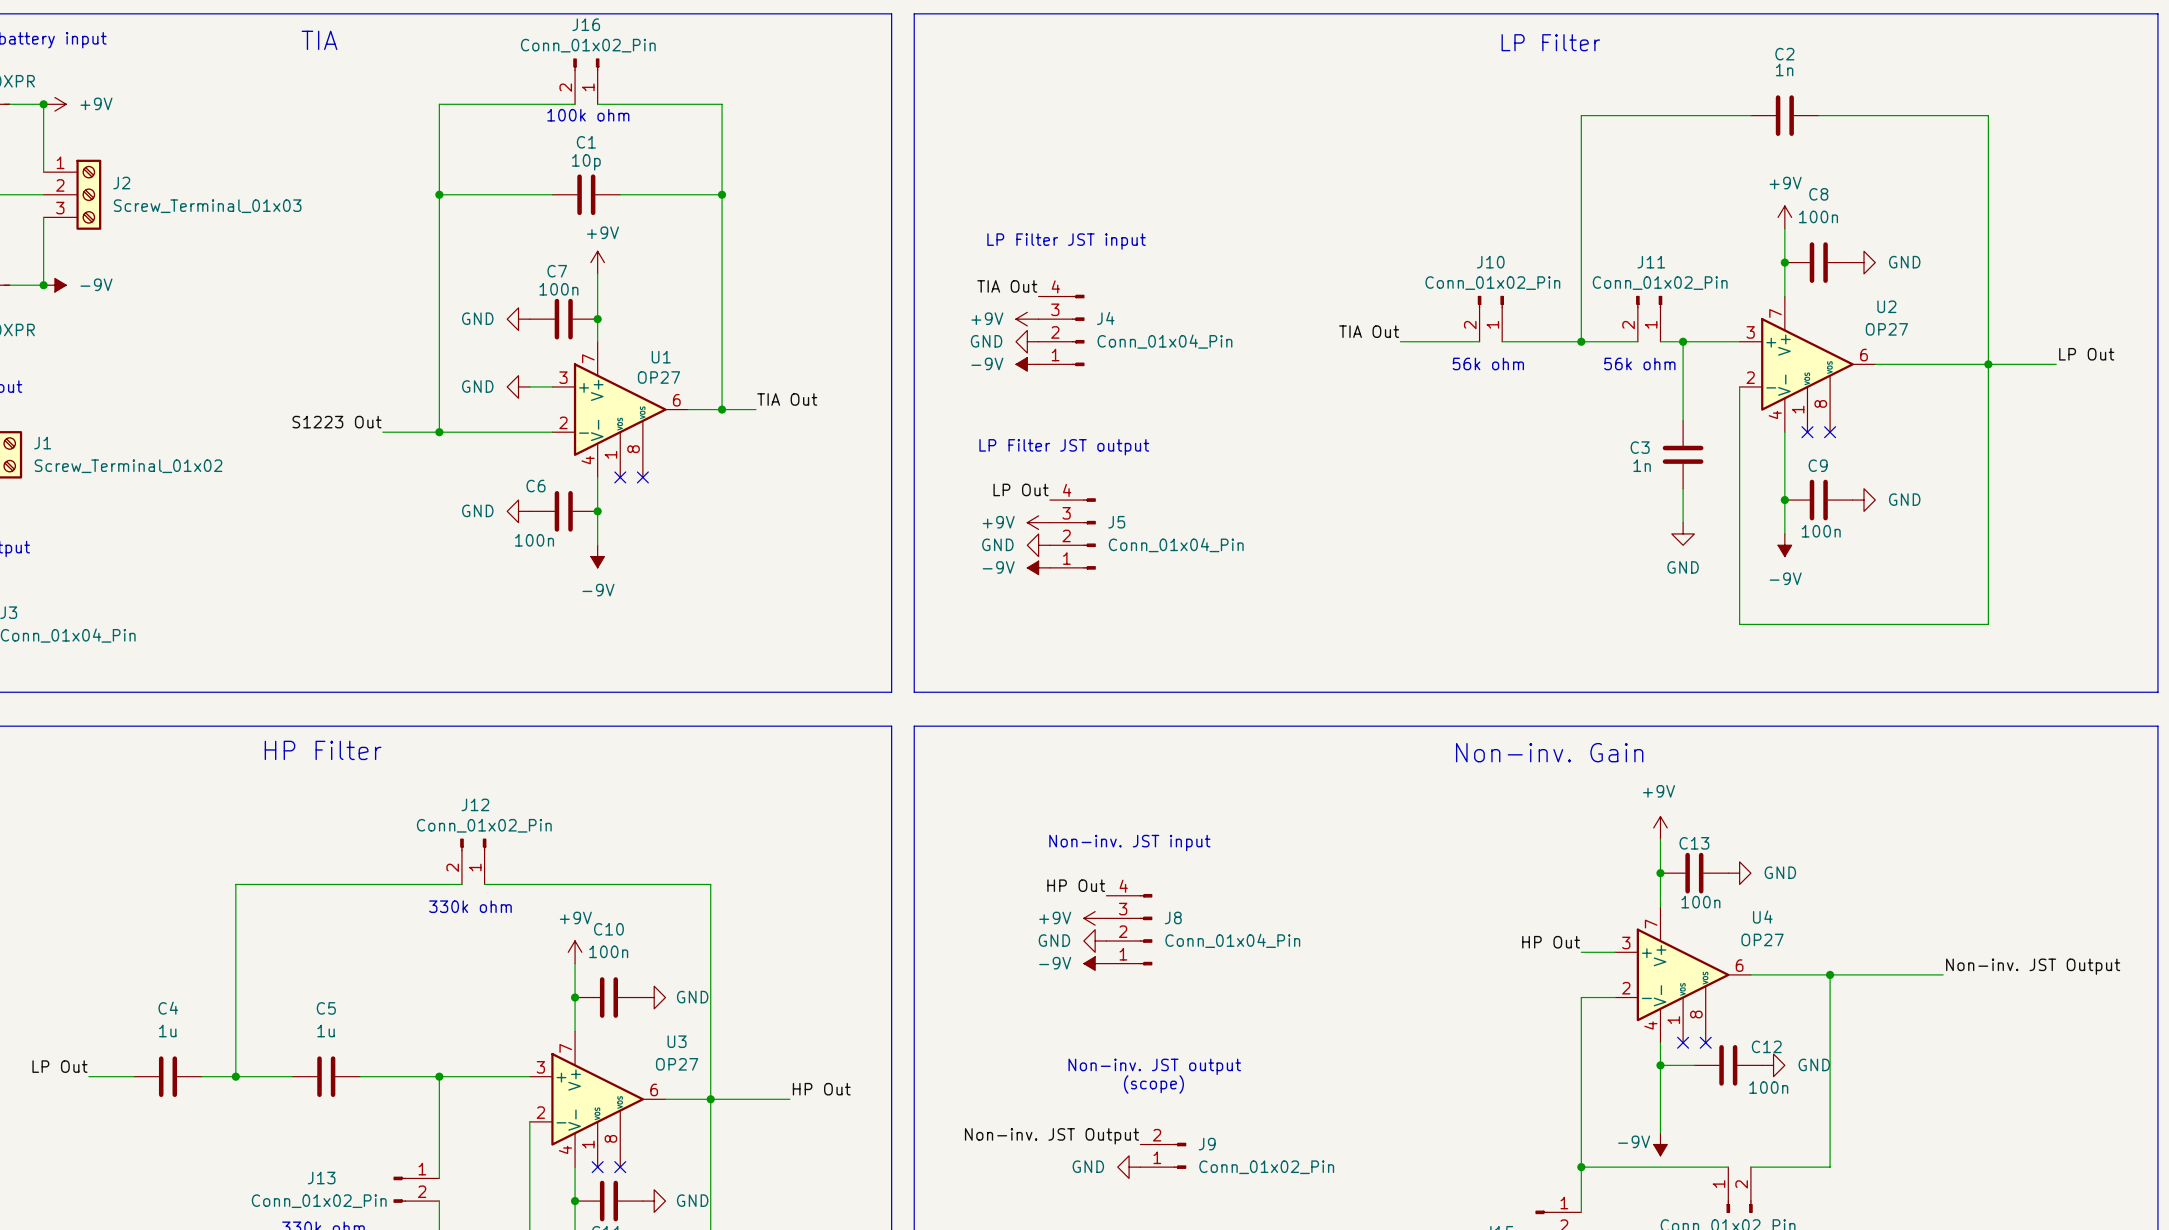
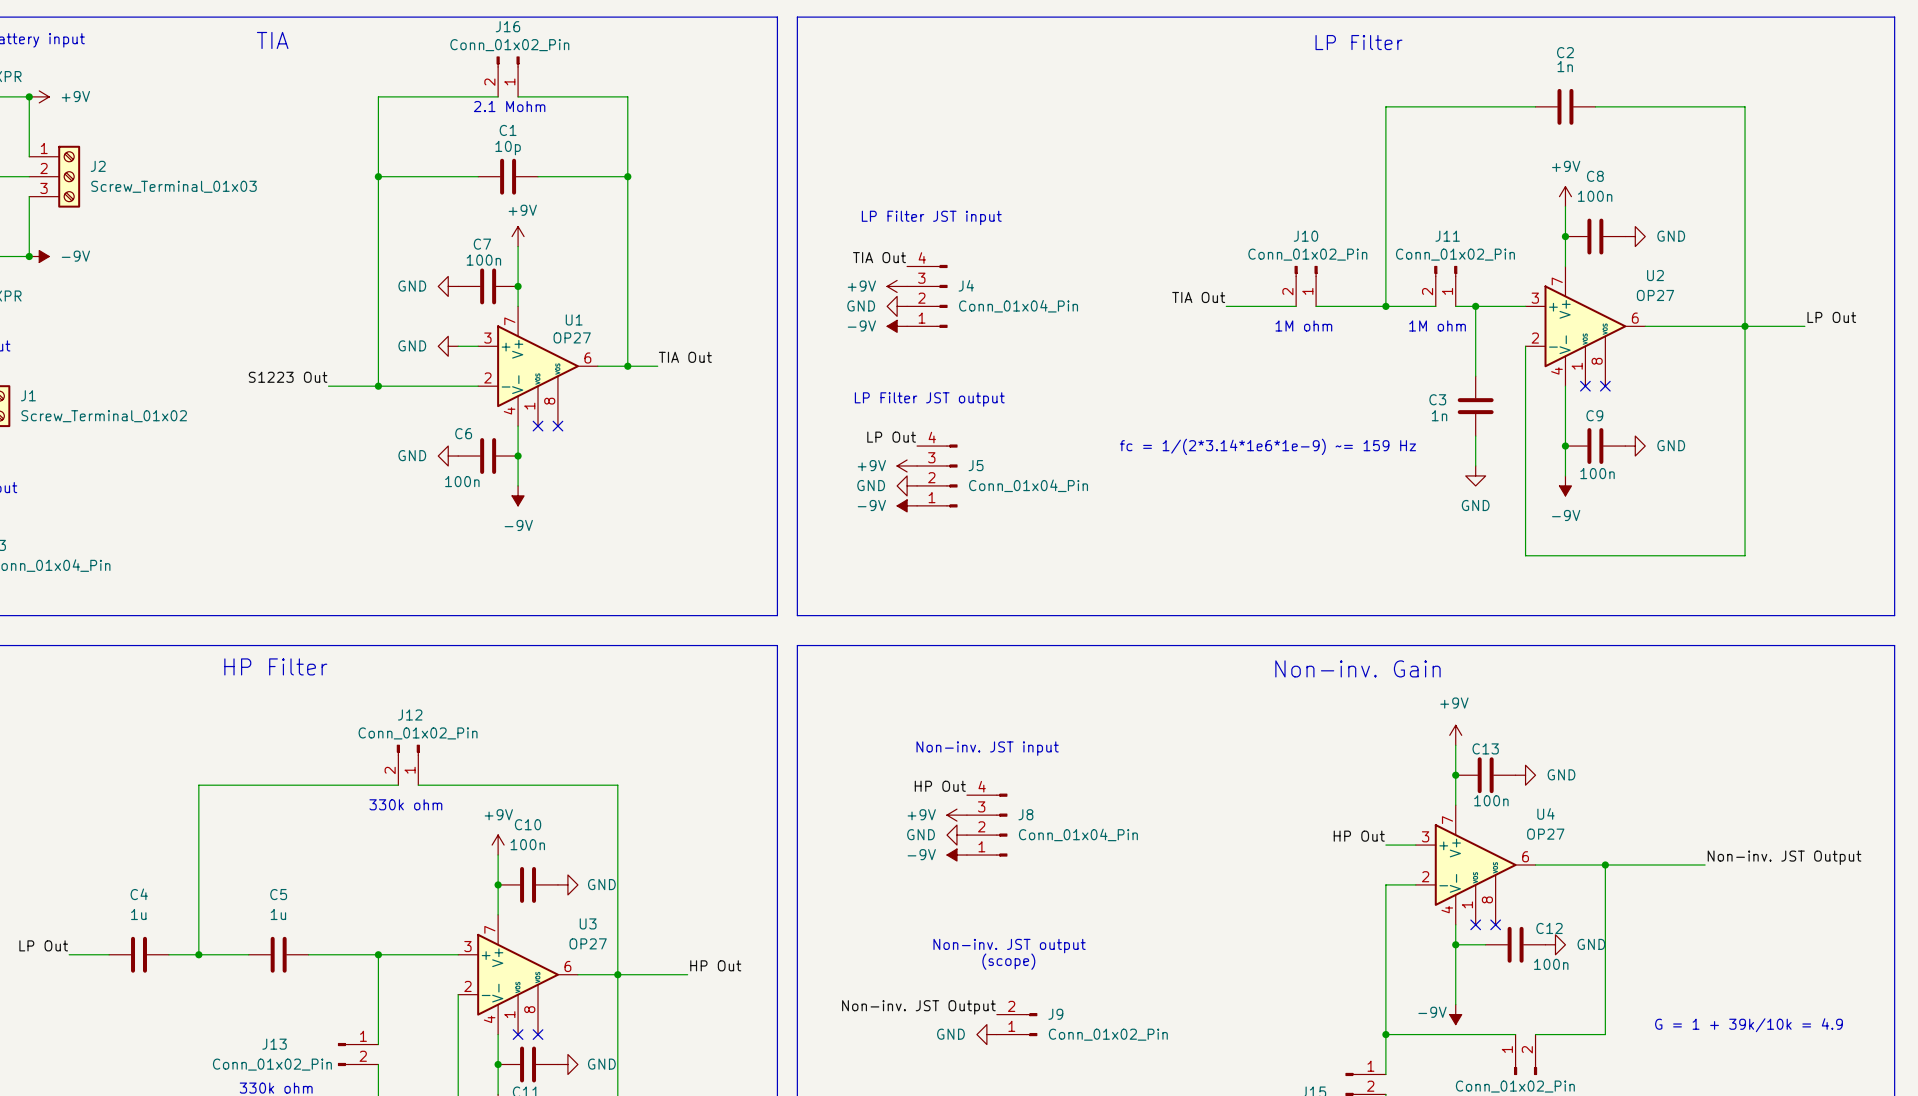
text: 100k ohm (588, 115) -> 2.1 Mohm (509, 106)
text: 56k ohm (1488, 363) -> 1M ohm (1303, 325)
text: 56k ohm (1639, 363) -> 1M ohm (1437, 325)
text: none -> fc = 1/(2*3.14*1e6*1e-9) ~= 159 Hz (1267, 446)
text: none -> G = 1 + 39k/10k = 4.9 (1749, 1025)

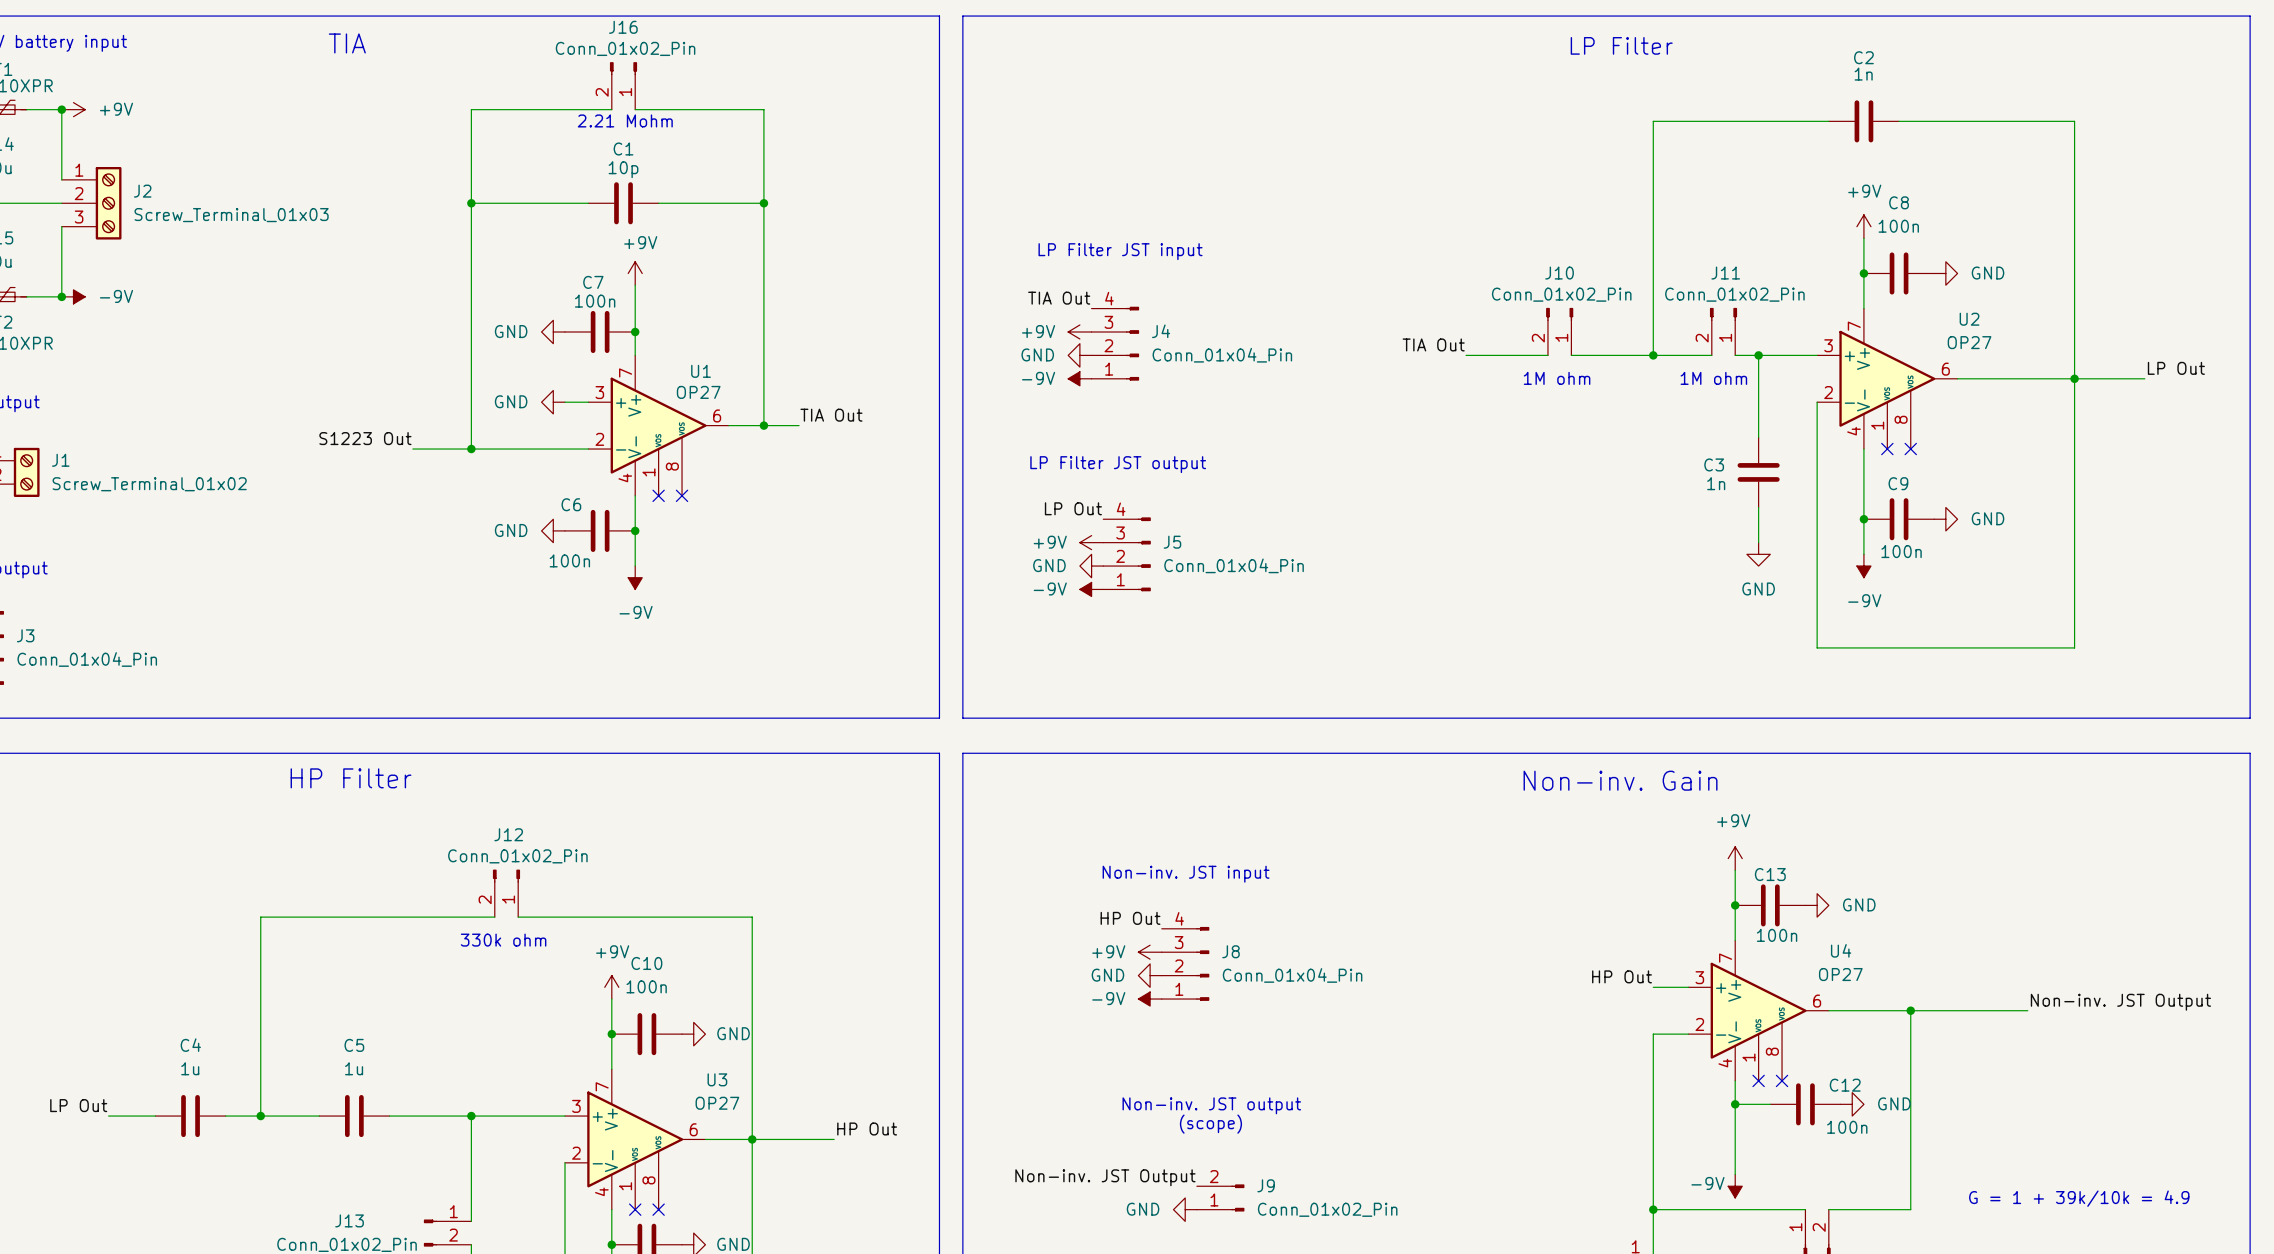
text: 2.1 Mohm (509, 106) -> 2.21 Mohm (625, 120)
text: fc = 1/(2*3.14*1e6*1e-9) ~= 159 Hz (1267, 446) -> none

